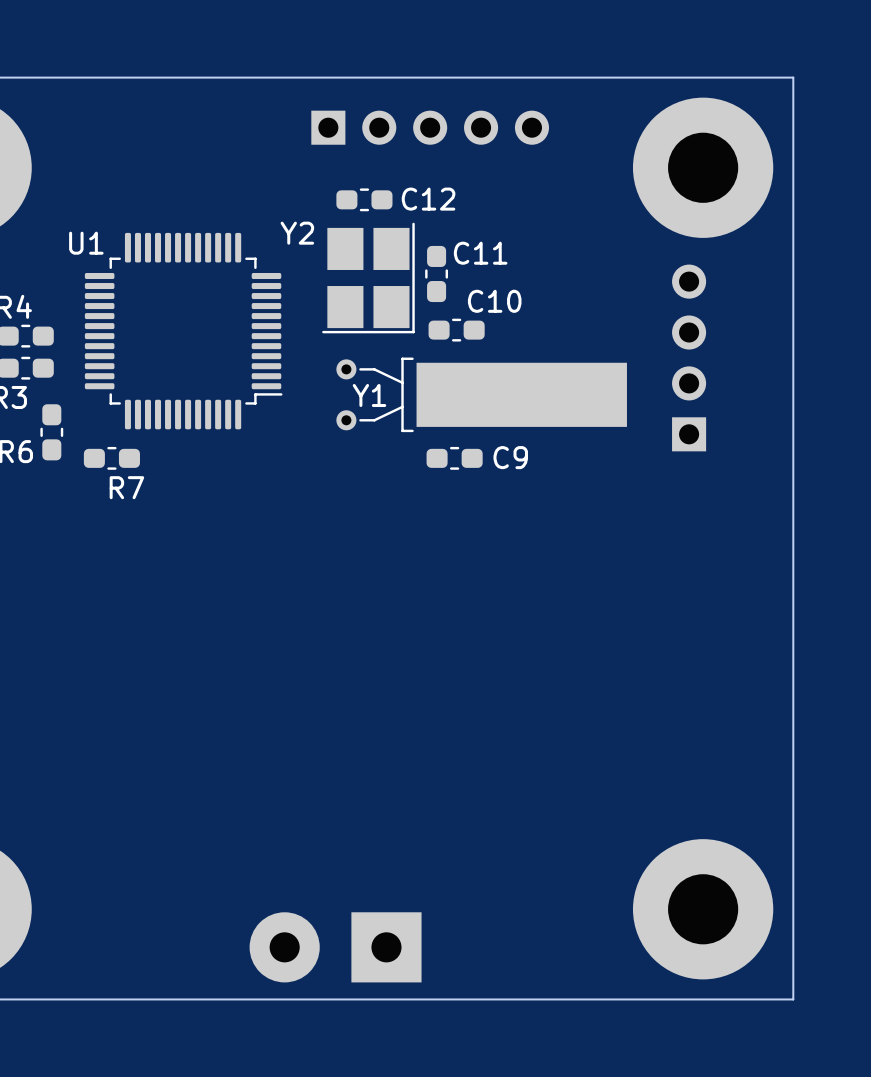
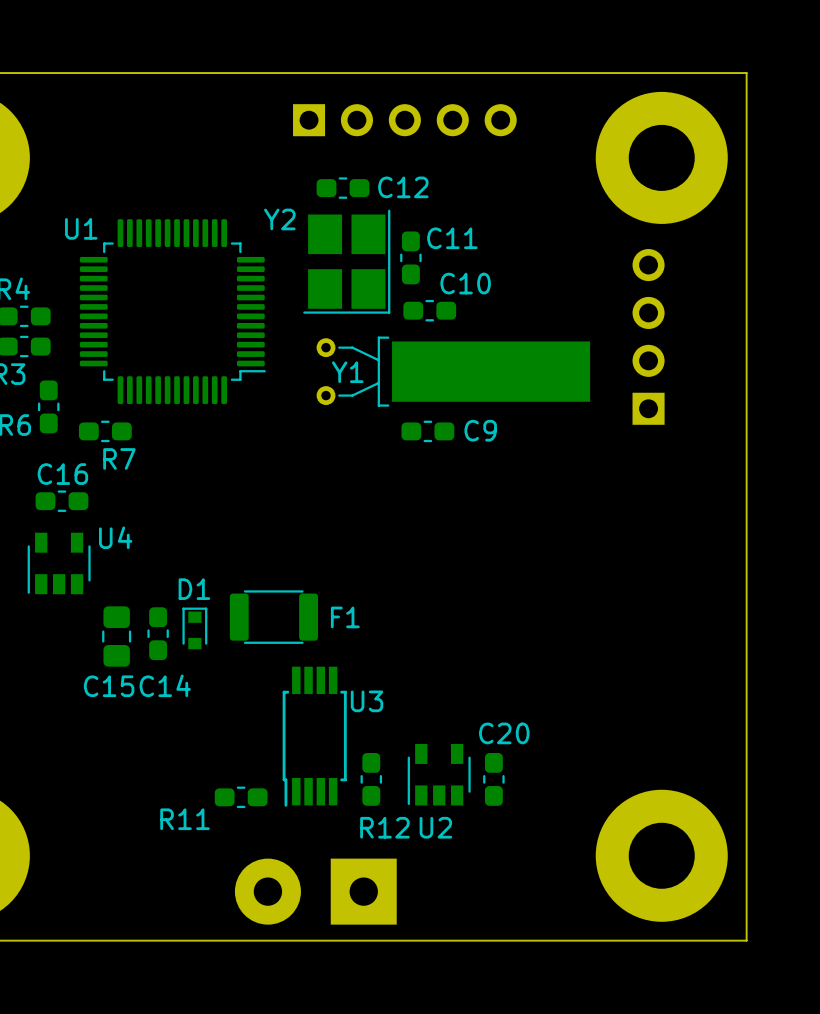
C16: none -> (61, 501)
U4: none -> (59, 563)
F1: none -> (273, 617)
D1: none -> (194, 628)
C14: none -> (158, 633)
C15: none -> (116, 636)
U3: none -> (314, 736)
U2: none -> (439, 774)
R12: none -> (371, 779)
C20: none -> (493, 779)
R11: none -> (241, 797)

